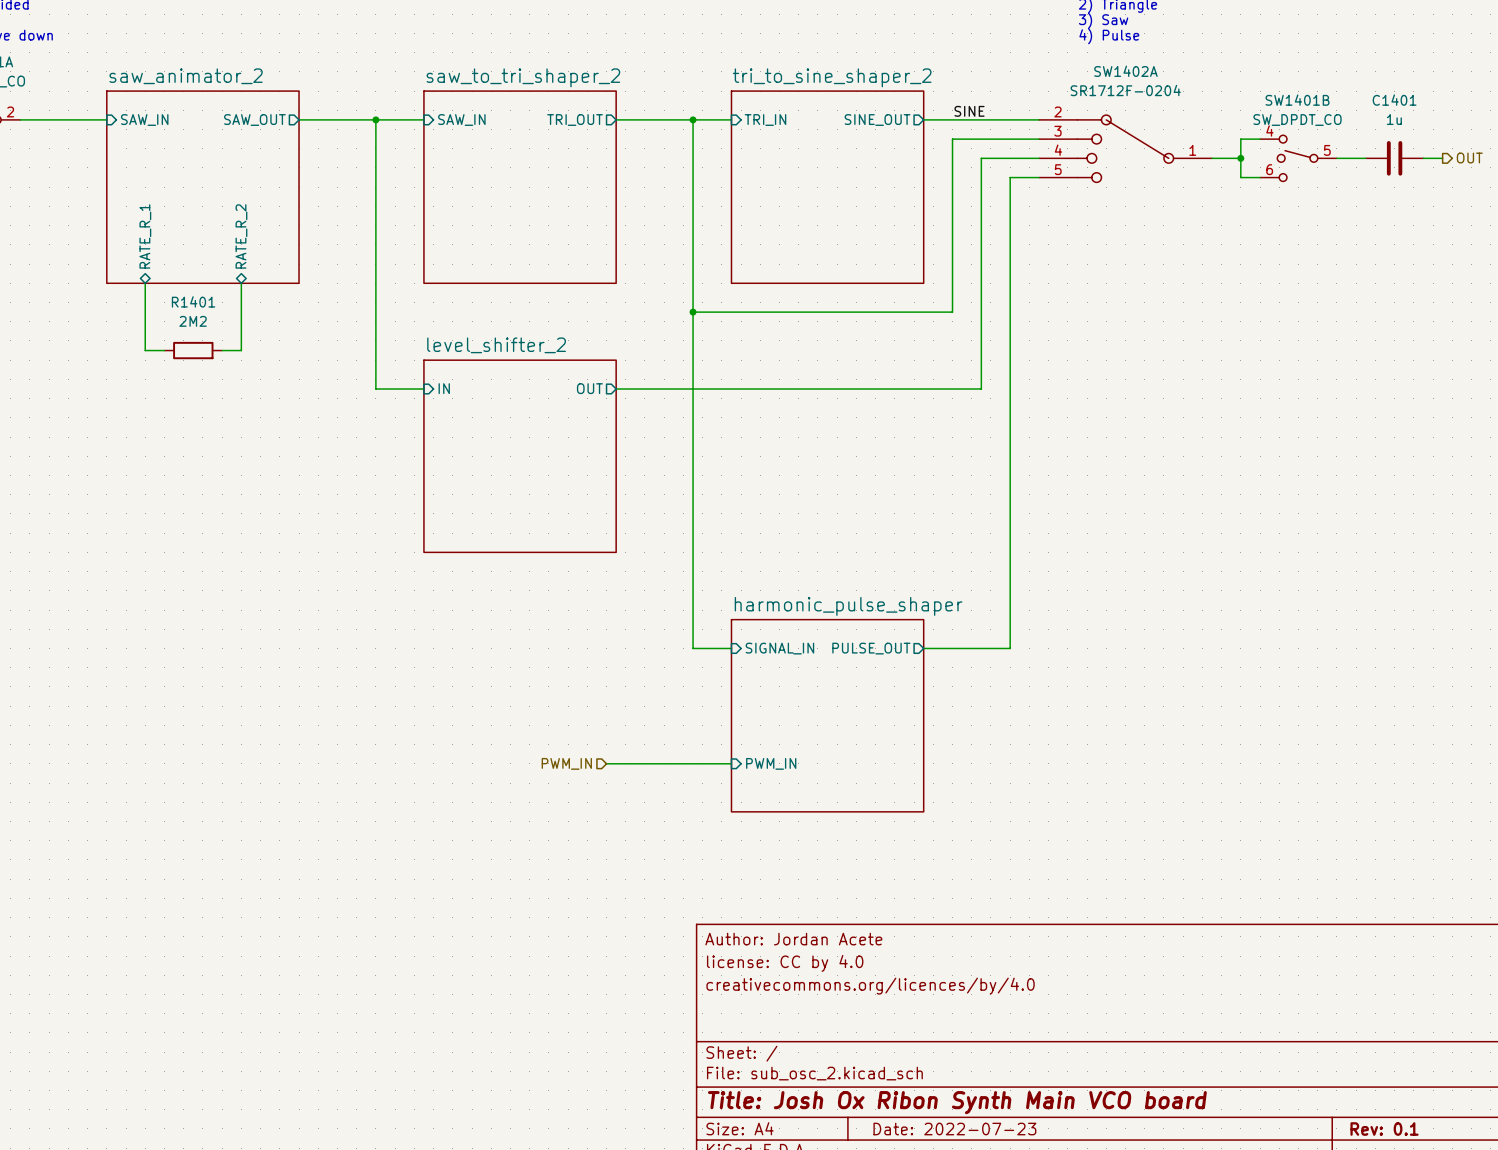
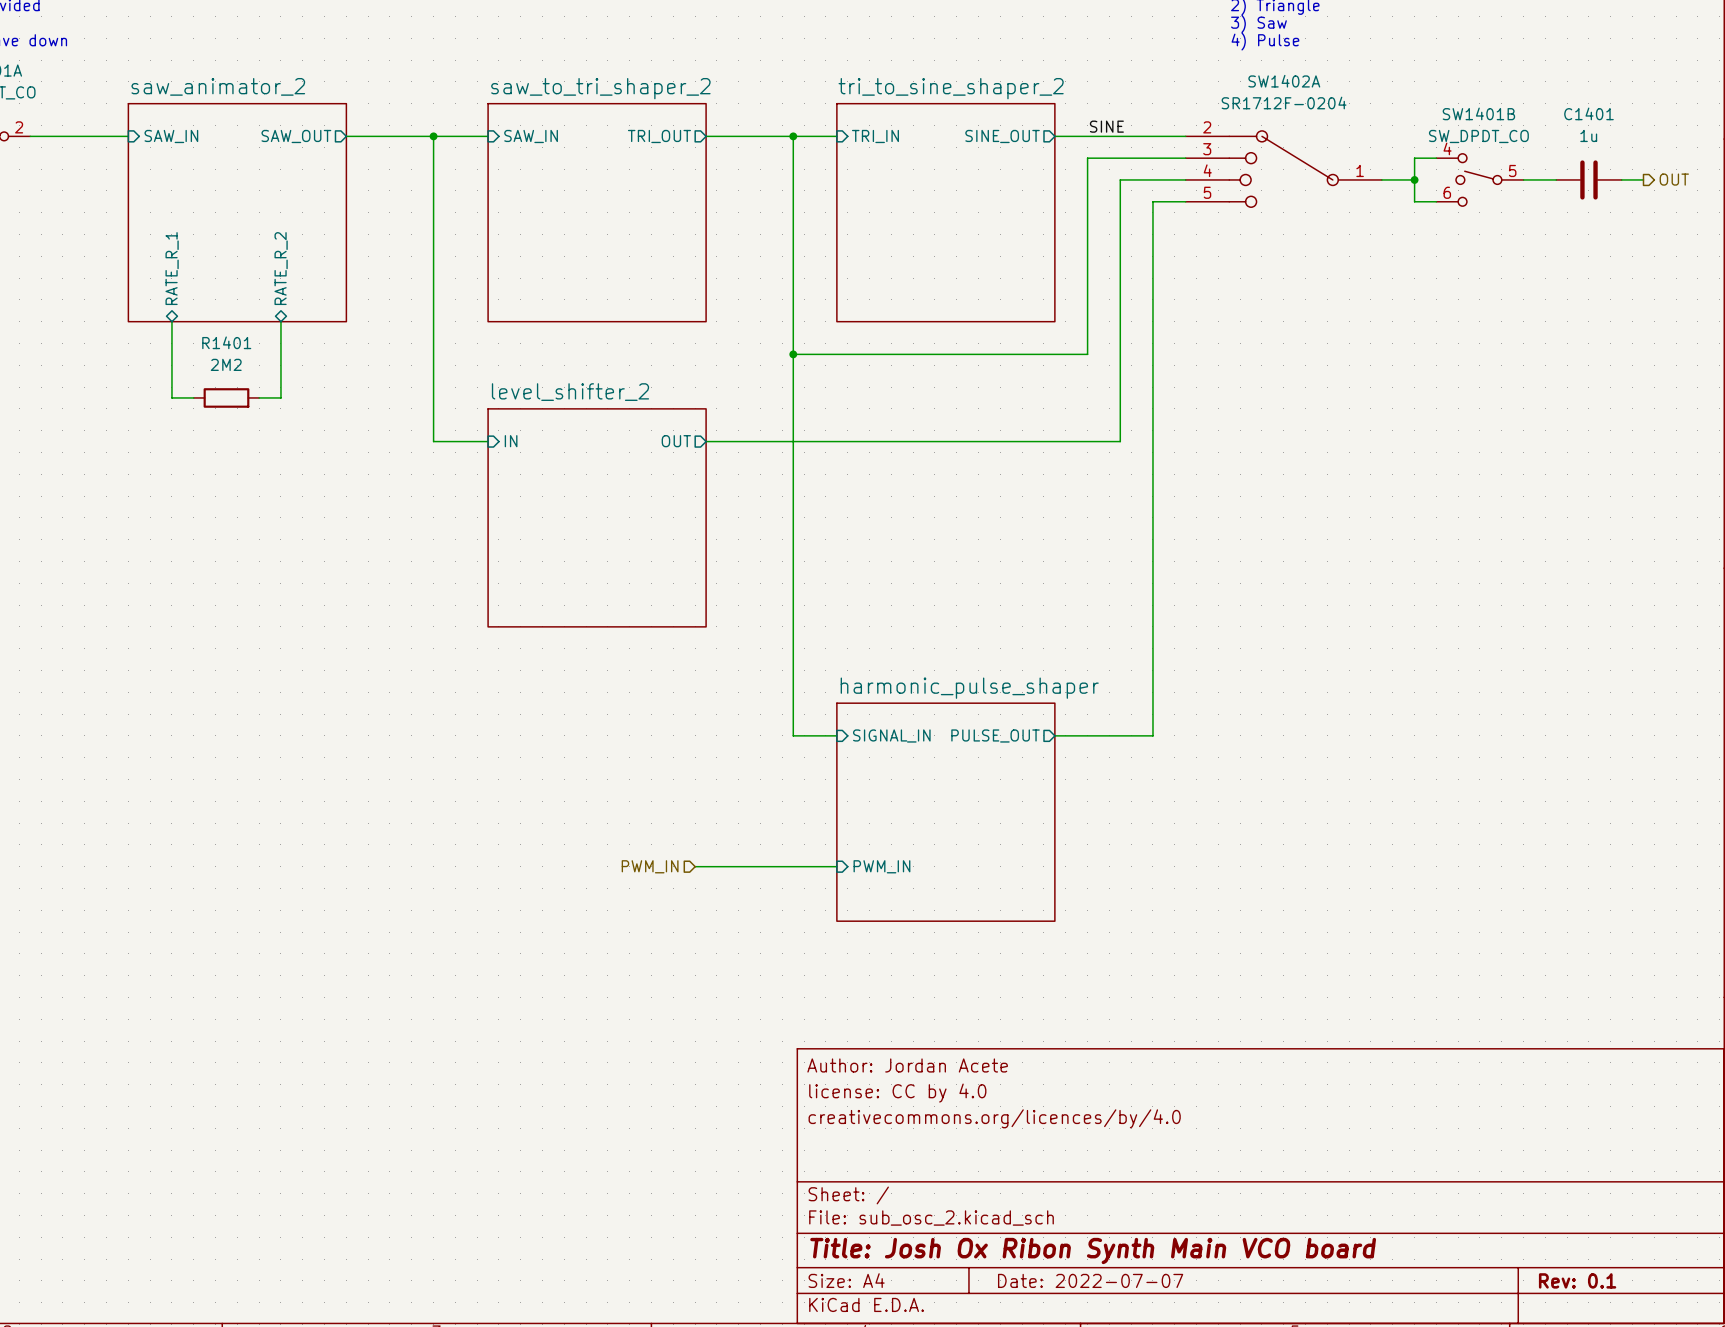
title block: Date: 2022-07-23 (954, 1129) -> Date: 2022-07-07 (1090, 1280)

